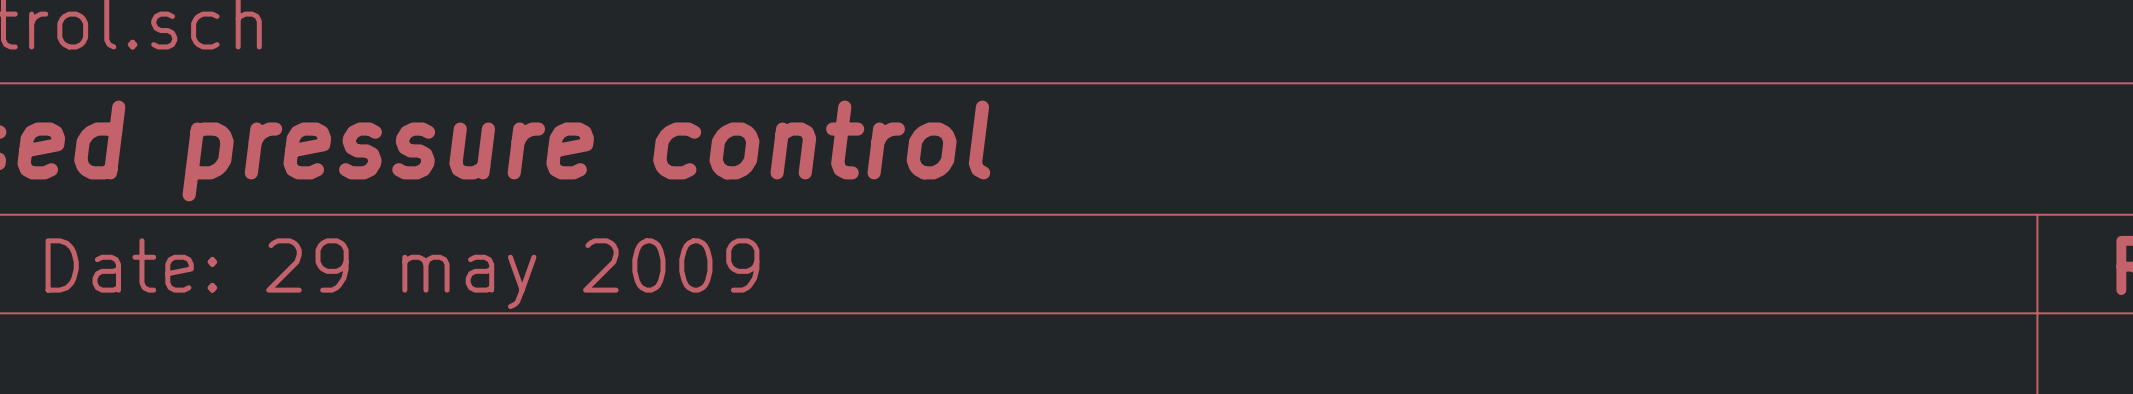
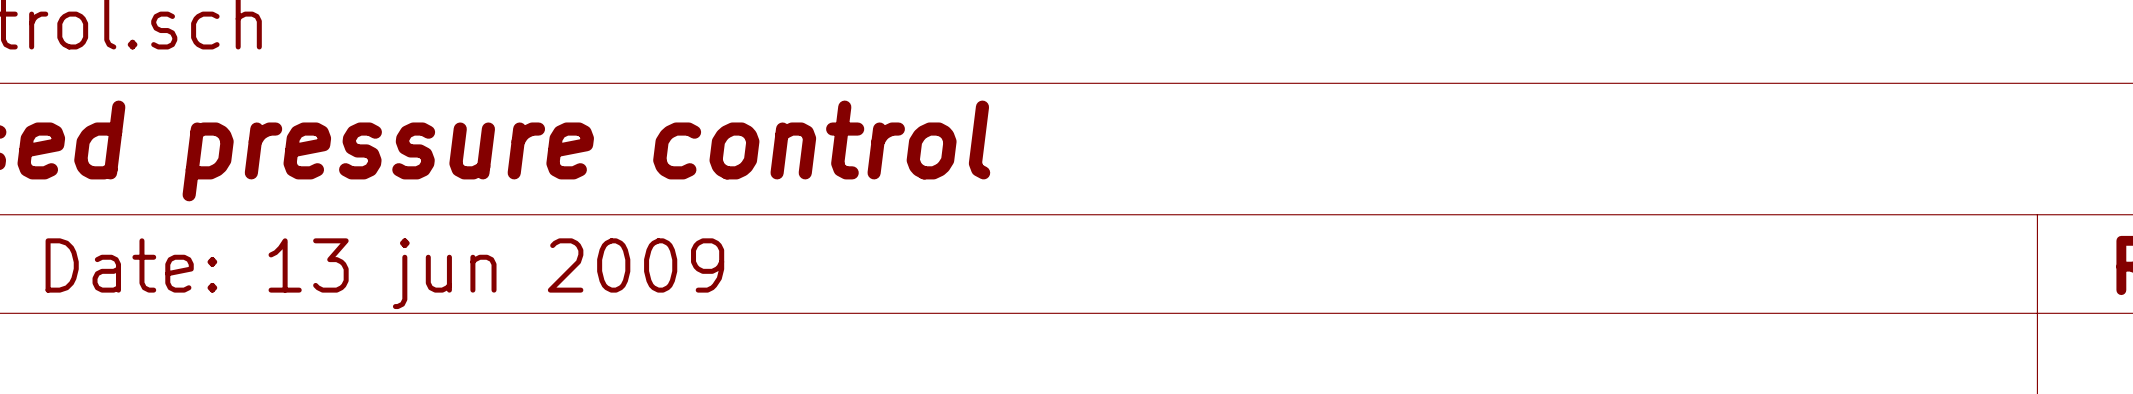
title block: Date: 29 may 2009 (402, 273) -> Date: 13 jun 2009 (384, 273)

